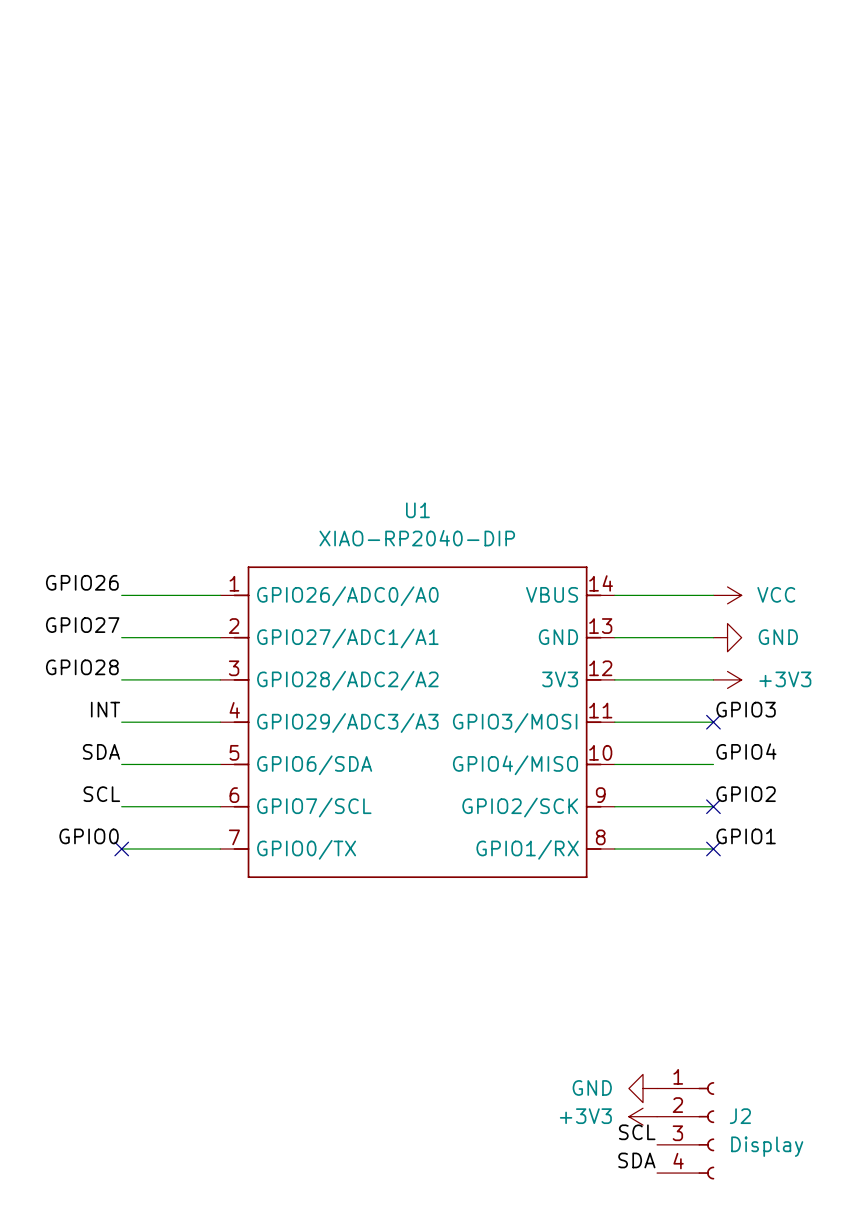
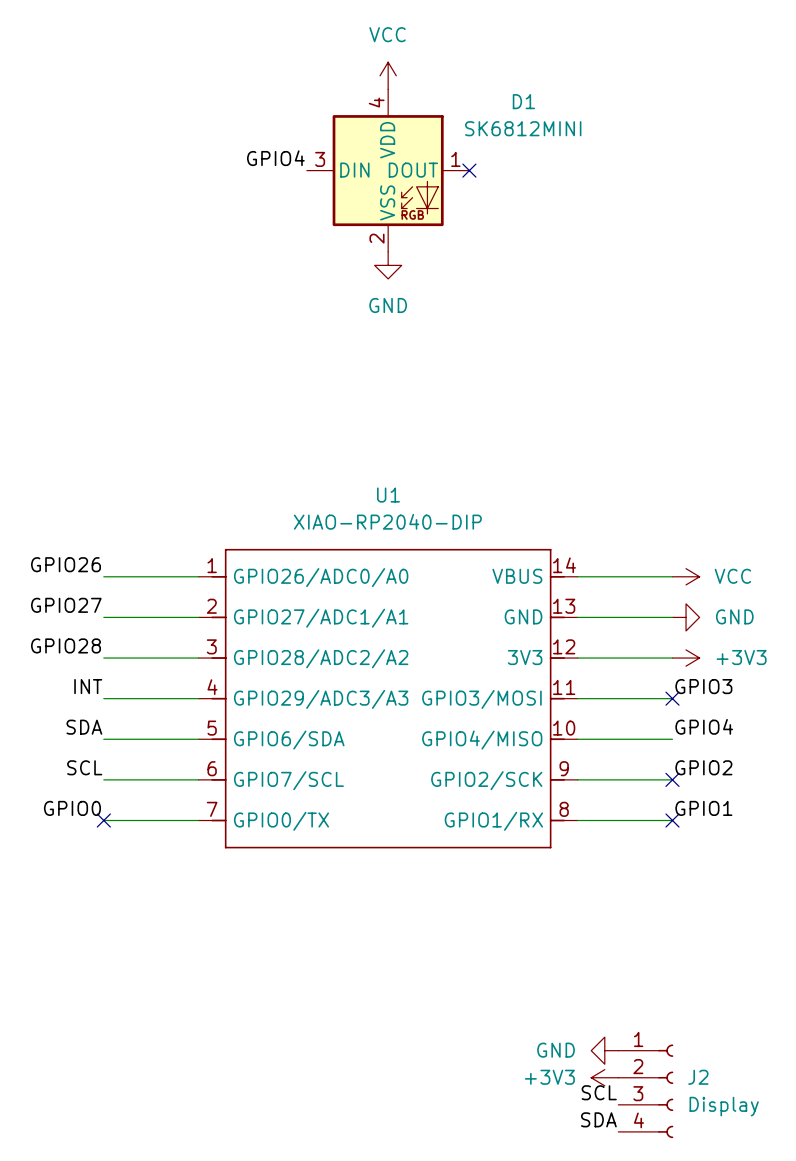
power symbol: none -> VCC (388, 75)
label: none -> GPIO4 (275, 158)
D1: none -> SK6812MINI (388, 170)
no-connect mark: none -> (469, 170)
power symbol: none -> GND (388, 265)

